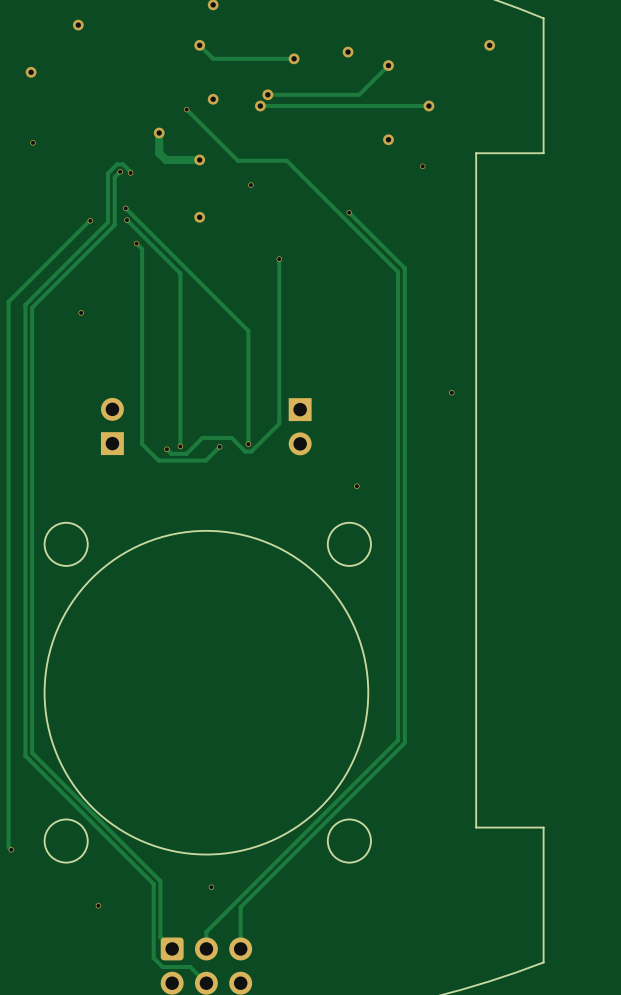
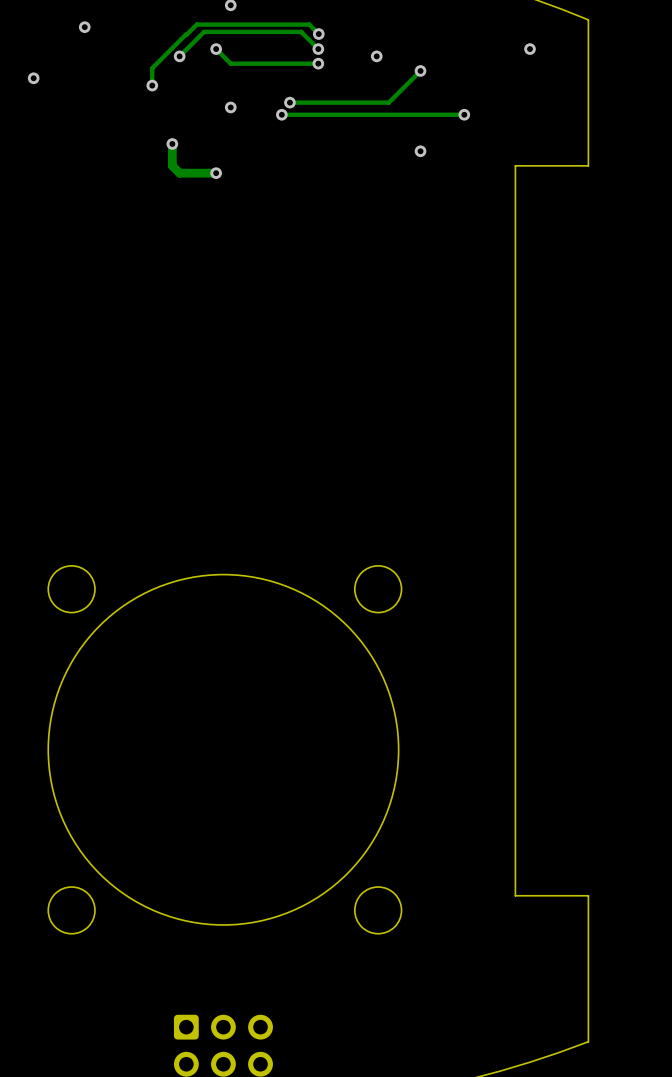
track: none -> (318, 34) (309, 24) (196, 24) (152, 68) (152, 85)
via: none -> (318, 34)
track: none -> (318, 49) (301, 31) (204, 31) (179, 56)
via: none -> (318, 49)
via: none -> (179, 56)
via: none -> (152, 85)
track: (186, 109) (237, 160) (286, 160) (398, 272) (398, 740) (206, 931) (206, 948) -> none
via: (186, 109) -> none
via: (32, 142) -> none
via: (422, 166) -> none
track: (120, 171) (114, 177) (114, 225) (32, 307) (32, 752) (160, 881) (160, 937) (172, 948) -> none
via: (120, 171) -> none
track: (130, 172) (123, 164) (117, 164) (107, 173) (107, 222) (25, 304) (25, 755) (153, 884) (153, 958) (162, 967) (190, 967) (206, 983) -> none
via: (130, 172) -> none
via: (250, 185) -> none
track: (125, 208) (248, 330) (248, 444) -> none
via: (125, 208) -> none
track: (349, 212) (404, 268) (404, 743) (240, 907) (240, 948) -> none
via: (349, 212) -> none
via: (199, 217) -> none
track: (90, 220) (8, 301) (8, 847) (11, 849) -> none
via: (90, 220) -> none
track: (127, 220) (180, 273) (180, 446) -> none
via: (127, 220) -> none
track: (136, 243) (142, 249) (142, 444) (158, 460) (205, 460) (219, 446) -> none
via: (136, 243) -> none
track: (279, 259) (279, 423) (251, 451) (245, 451) (231, 437) (202, 437) (186, 453) (171, 453) (166, 449) -> none
via: (279, 259) -> none
via: (81, 312) -> none
via: (451, 392) -> none
part: (112, 426) -> none
part: (300, 426) -> none
via: (248, 444) -> none
via: (180, 446) -> none
via: (219, 446) -> none
via: (166, 449) -> none
via: (356, 486) -> none
via: (11, 849) -> none
via: (211, 887) -> none
via: (98, 905) -> none

